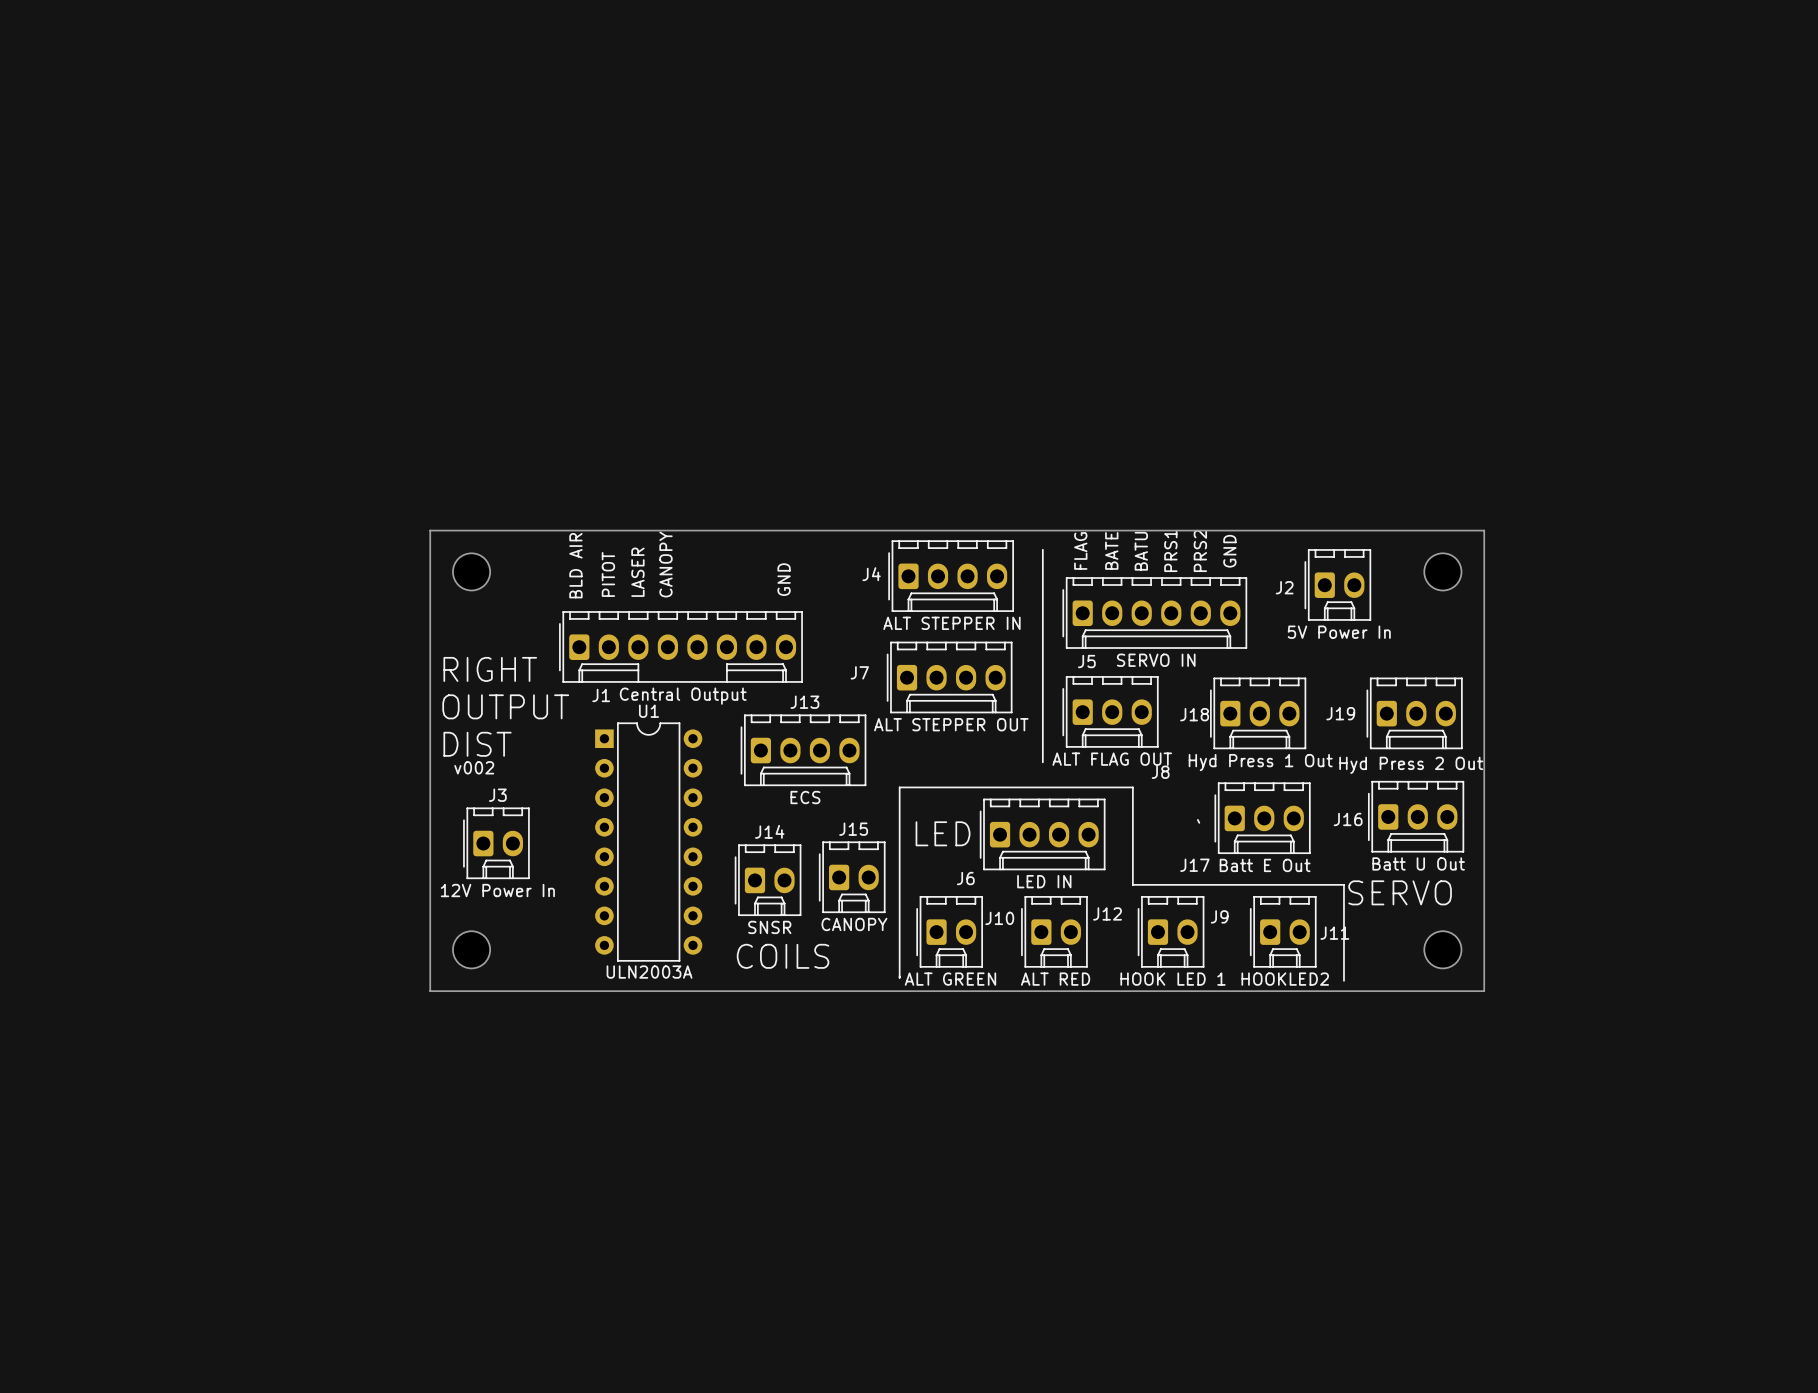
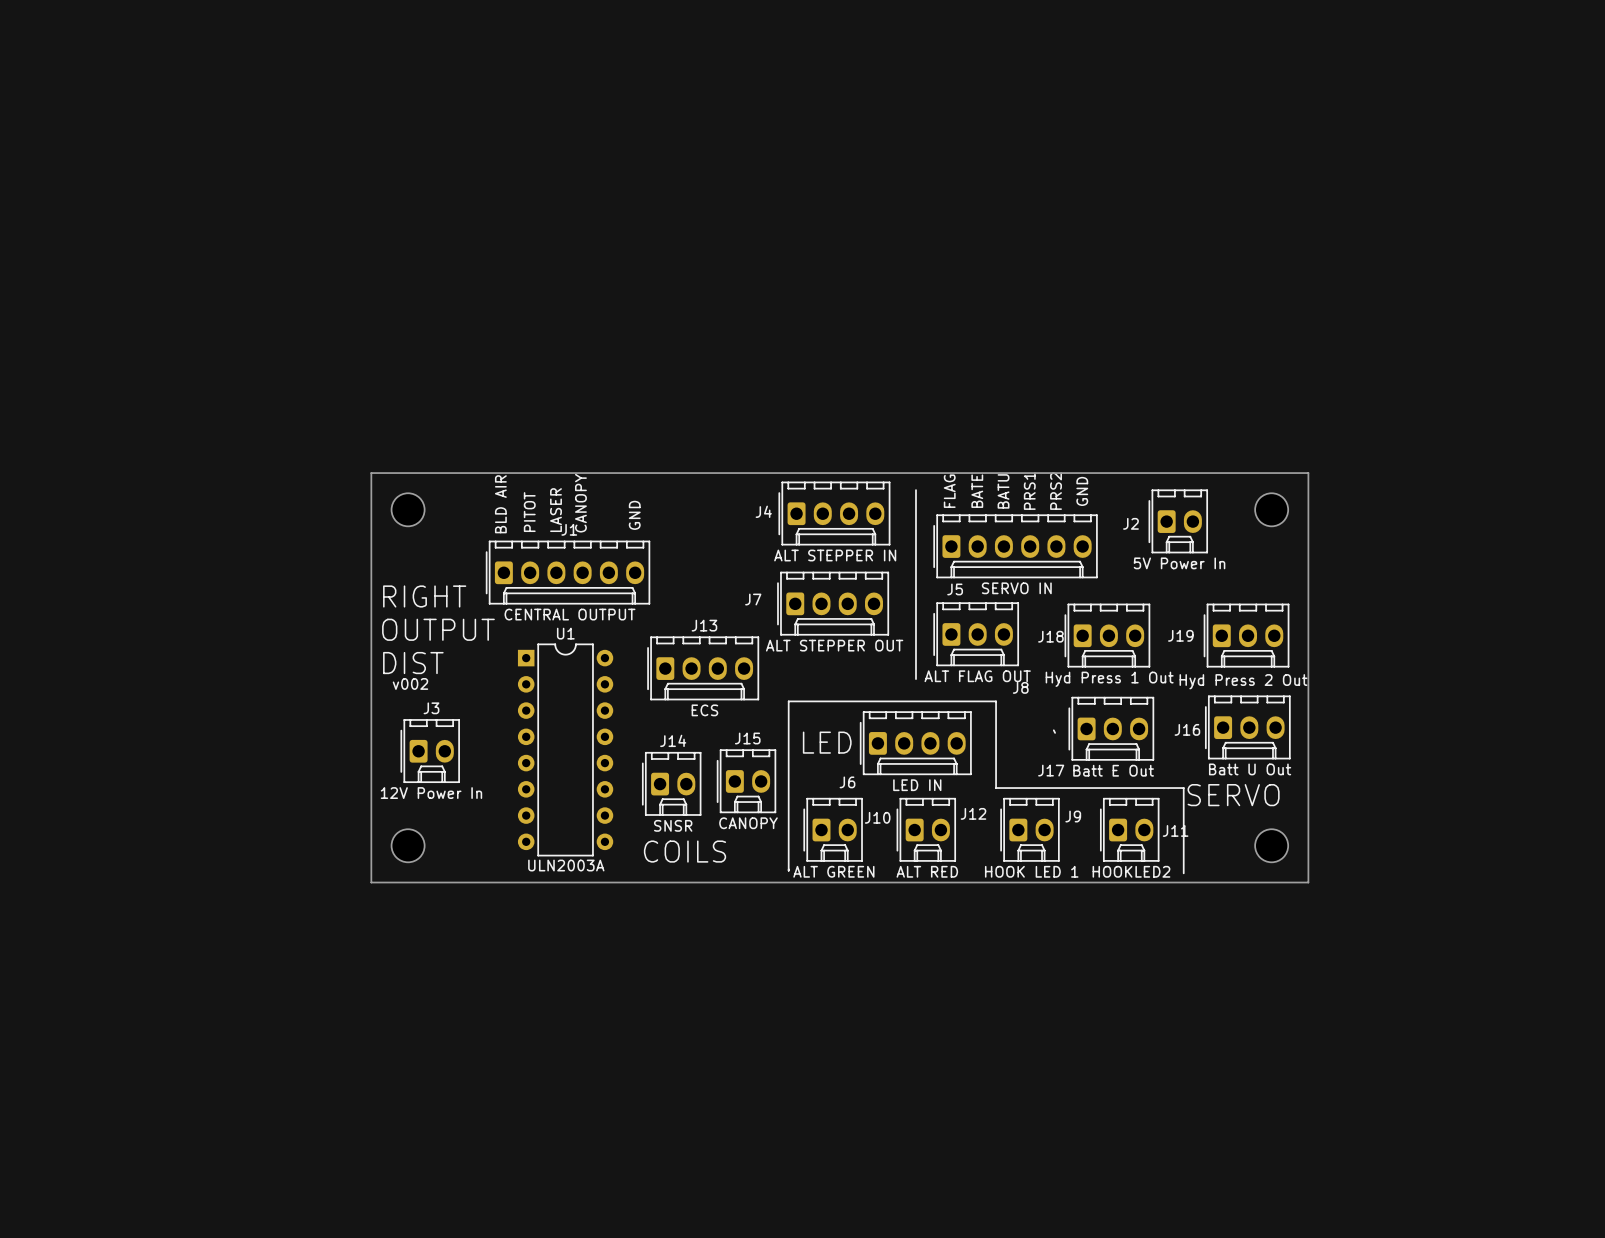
text position: GND (784, 579) -> GND (634, 515)
J1 footprint: [559, 611, 803, 683] -> [486, 540, 651, 605]
J1 name position: J1 (601, 695) -> J1 (569, 529)
J1 value: Central Output (683, 696) -> CENTRAL OUTPUT (570, 614)

